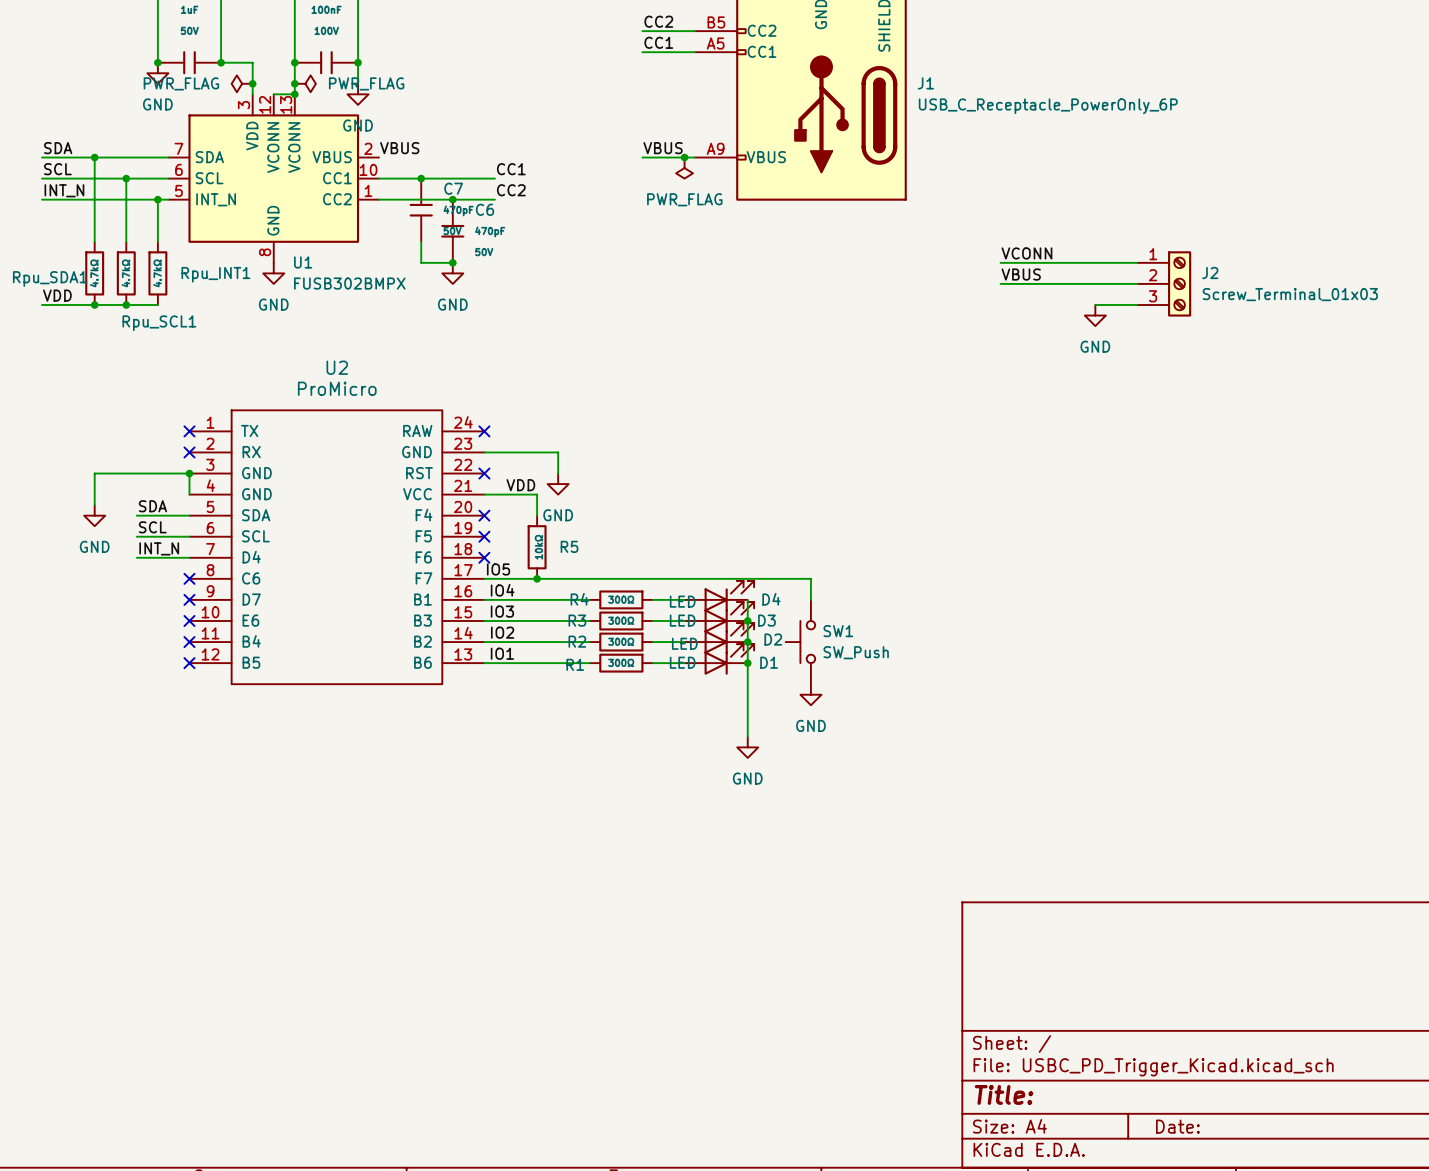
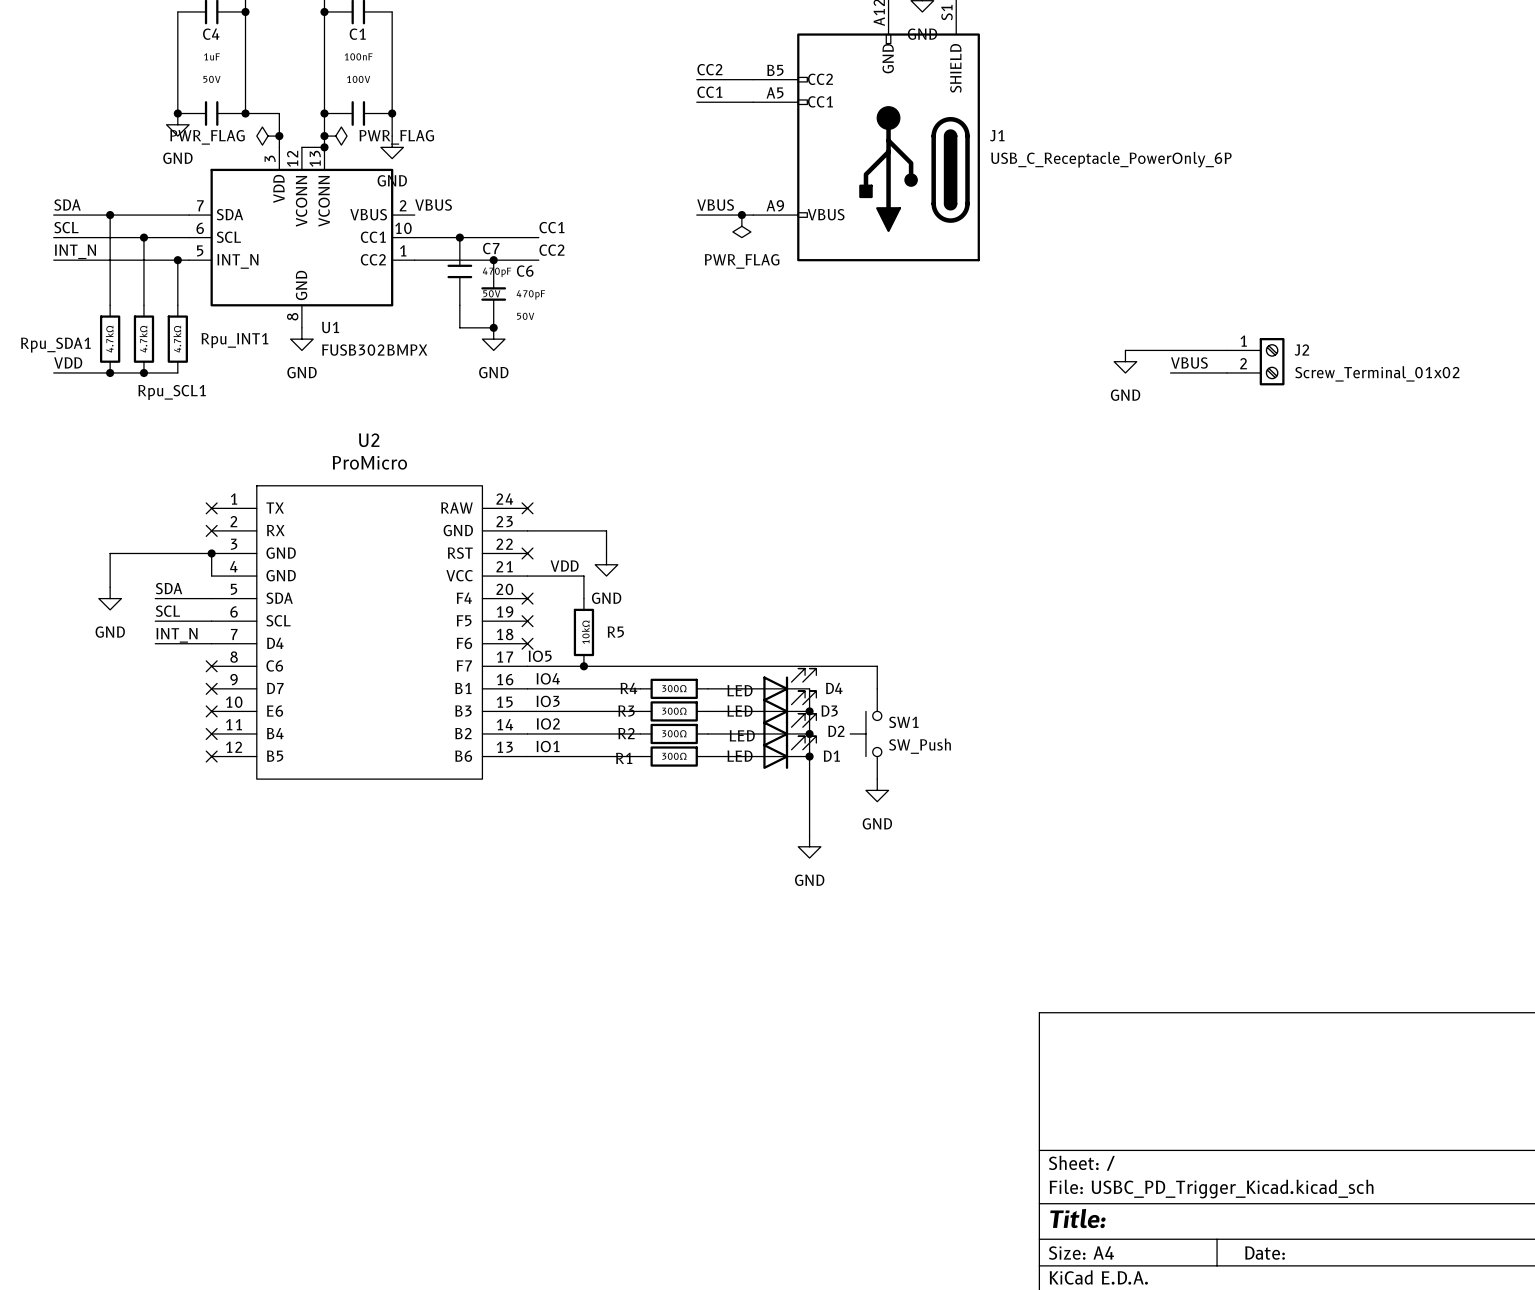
J2 symbol: [1137, 251, 1192, 317] -> [1226, 338, 1285, 386]
label: VCONN (1026, 253) -> none
wire: (1000, 262) (1137, 262) -> none
label position: VBUS (1021, 274) -> VBUS (1189, 362)
wire: (1000, 283) (1042, 283) -> none
J2 value: Screw_Terminal_01x03 (1290, 294) -> Screw_Terminal_01x02 (1377, 373)
wire: none -> (1170, 372) (1181, 372)
power symbol position: GND (1095, 315) -> GND (1125, 361)

